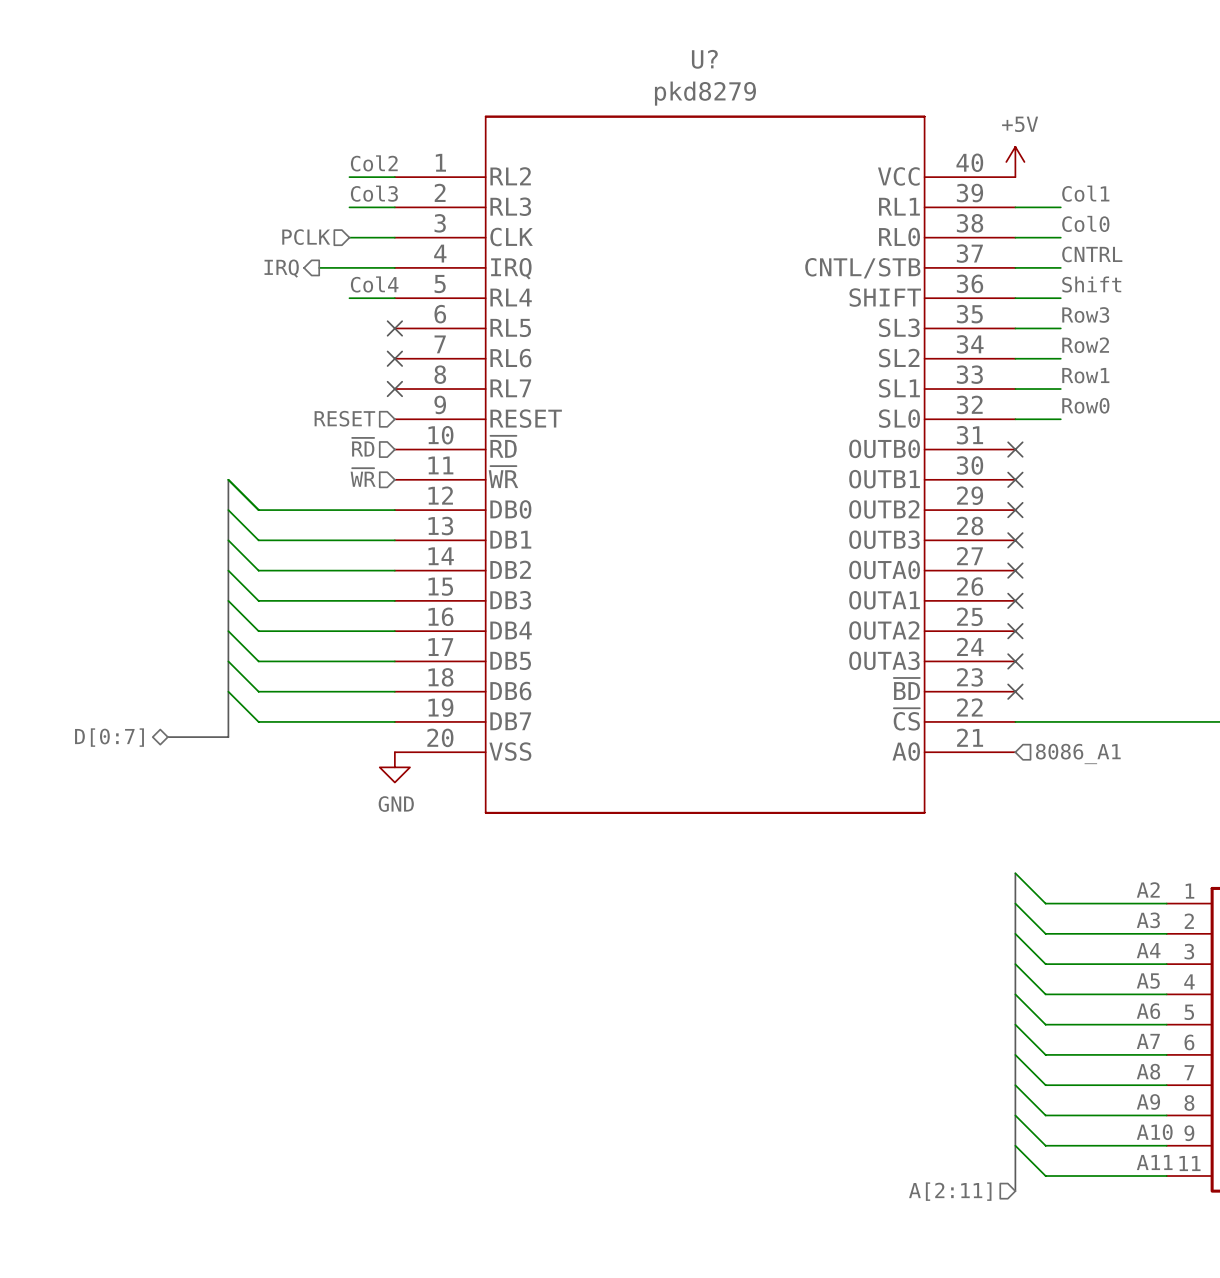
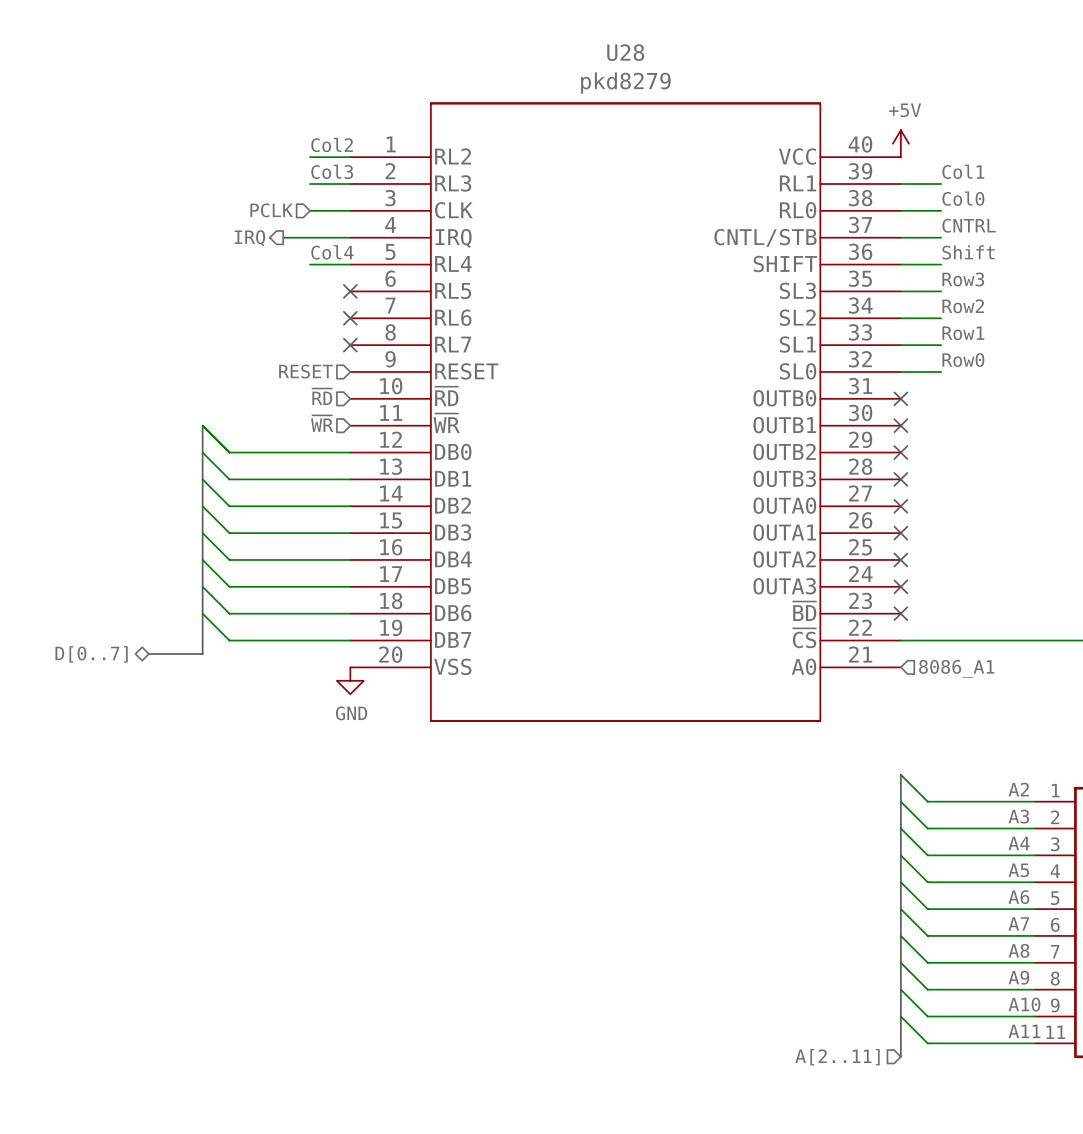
U? name: U? (704, 59) -> U28 (625, 52)
hierarchical label: D[0:7] (109, 737) -> D[0..7] (91, 654)
hierarchical label: A[2:11] (950, 1191) -> A[2..11] (837, 1057)

